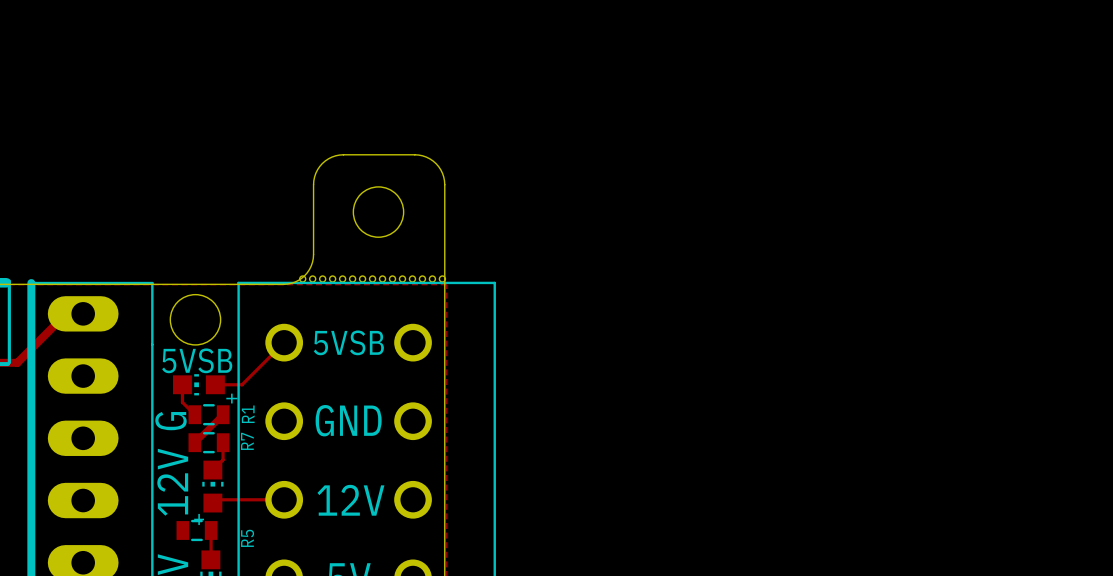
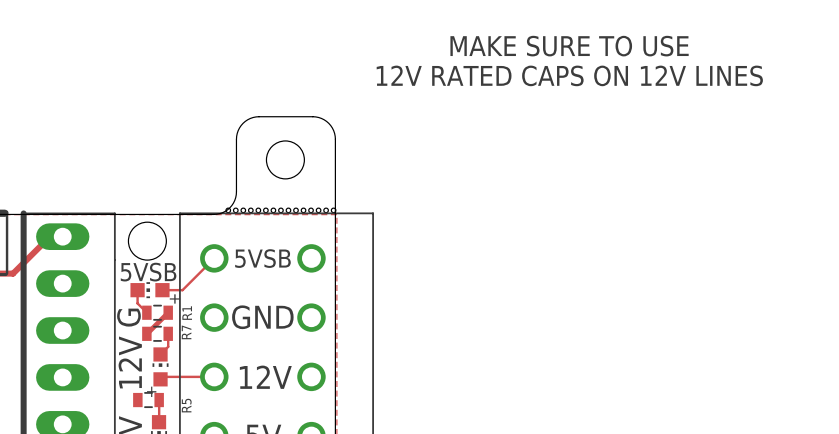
text: none -> MAKE SURE TO USE (569, 46)
text: none -> 12V RATED CAPS ON 12V LINES (569, 75)

